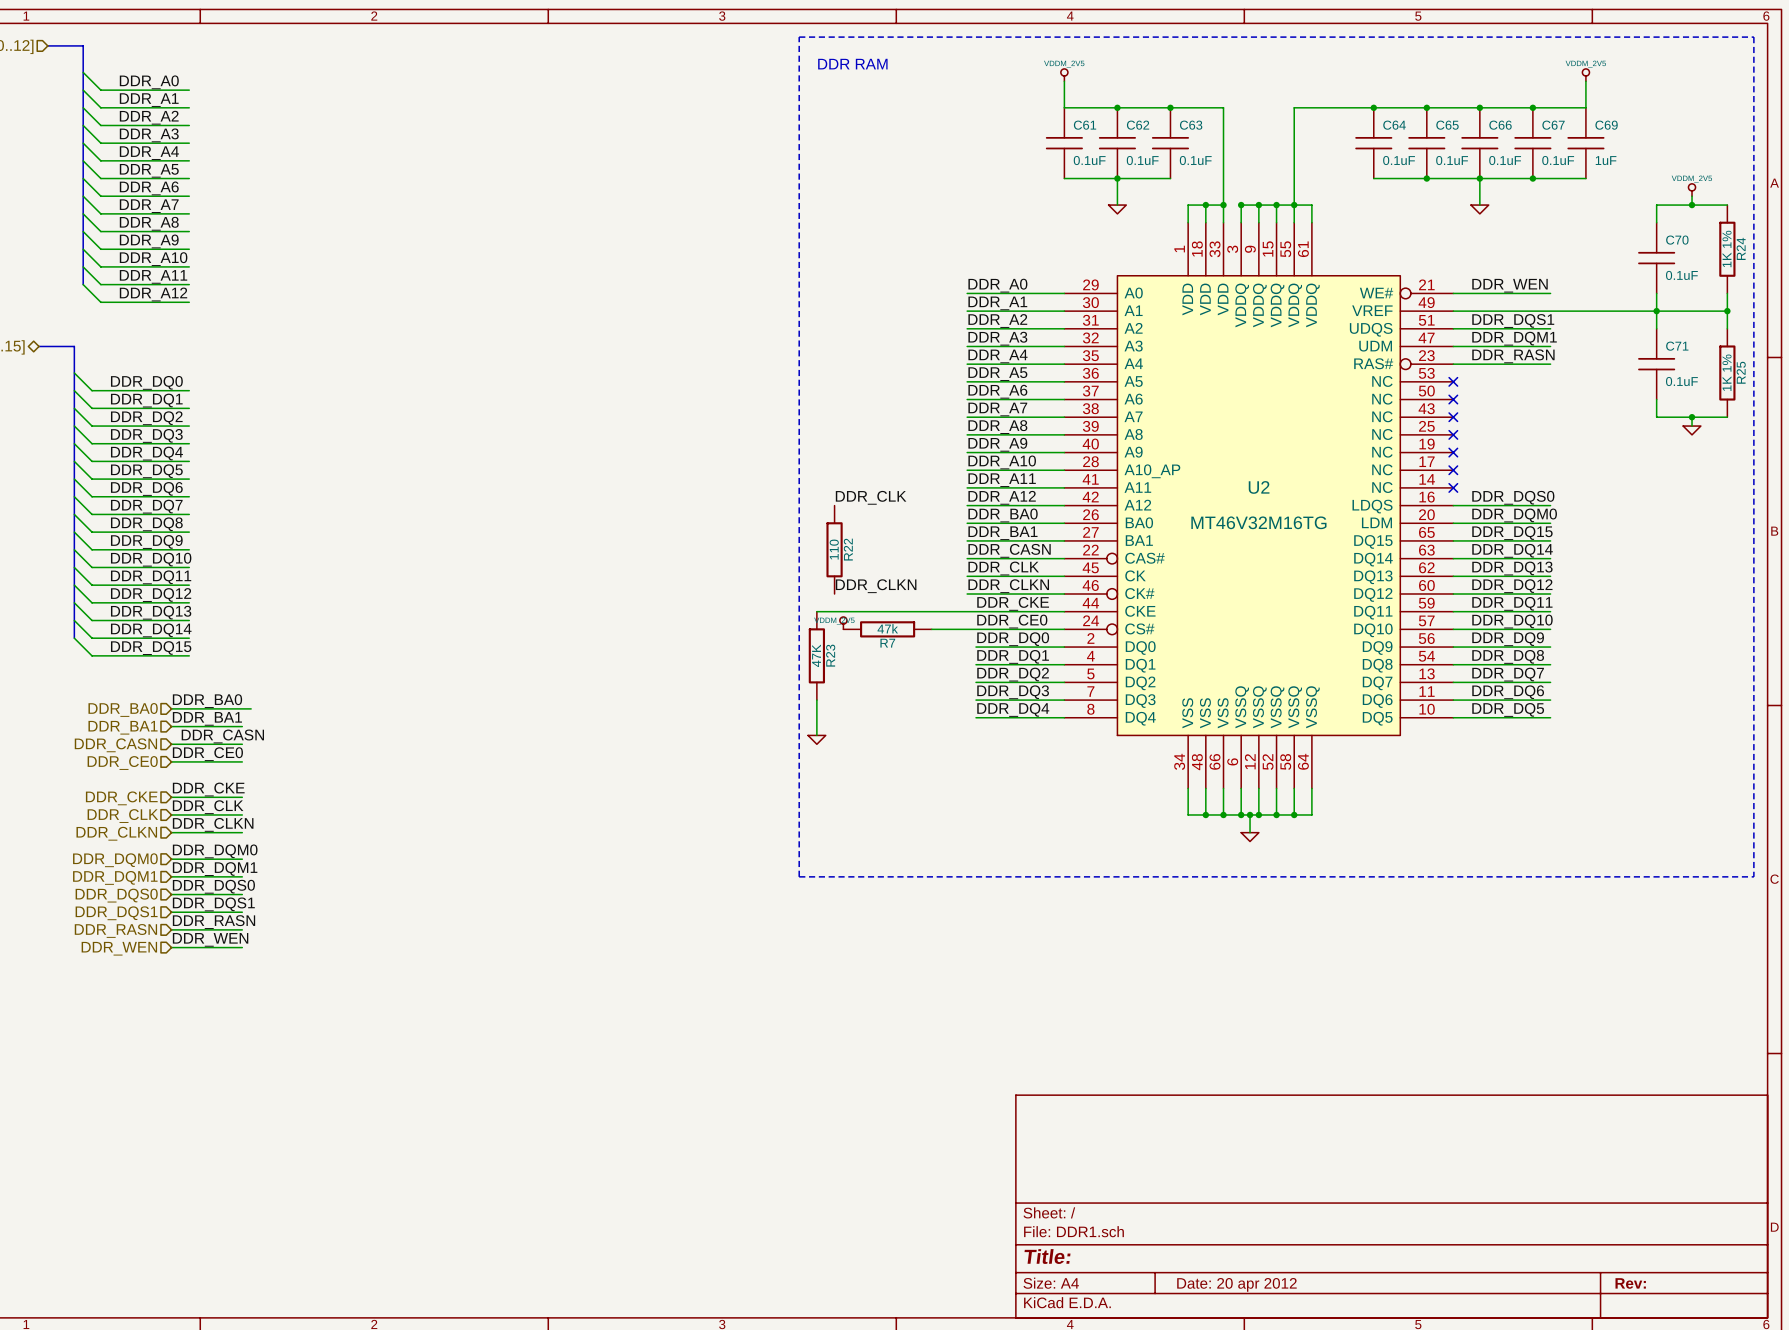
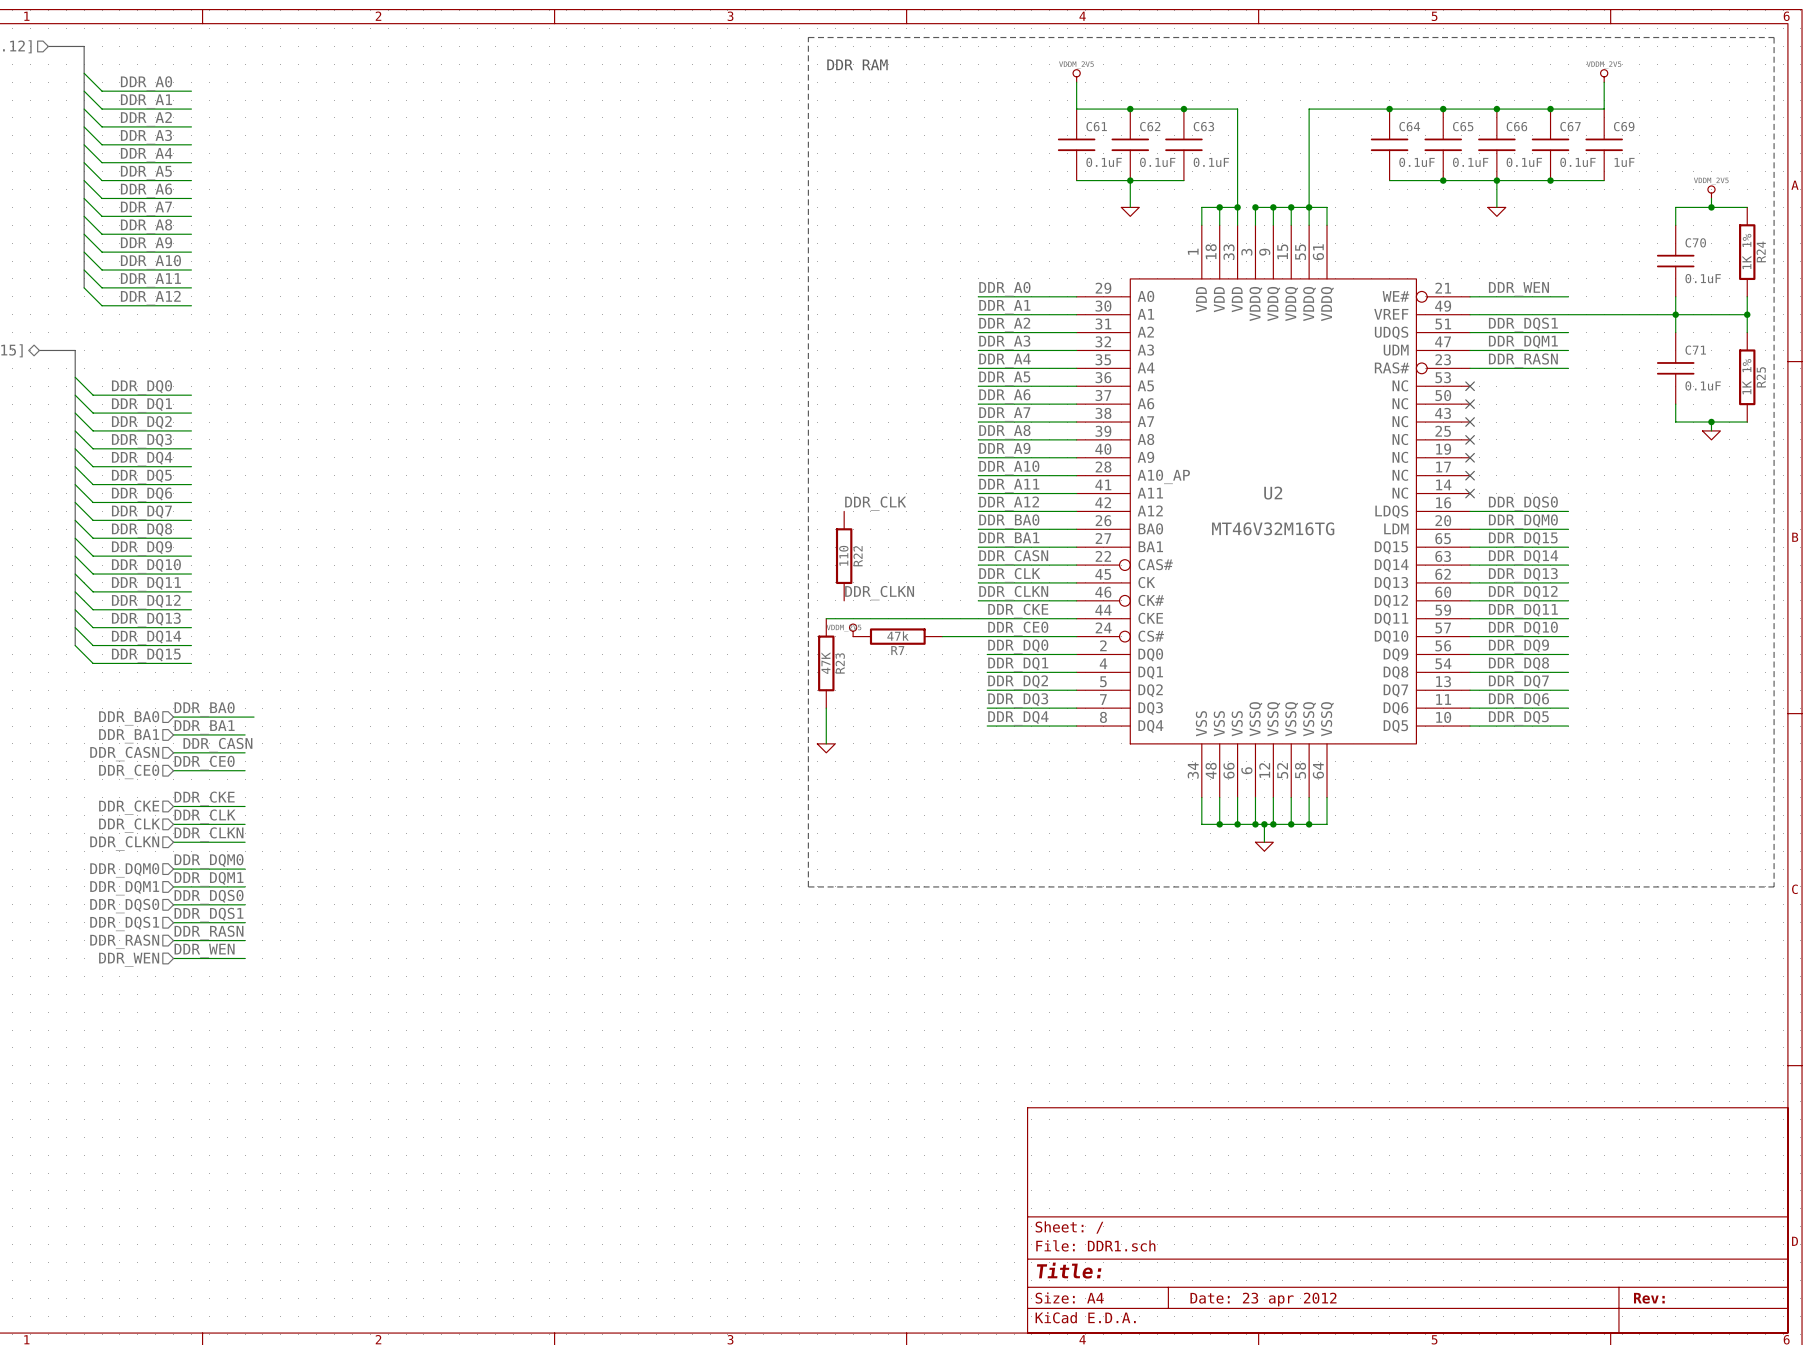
title block: Date: 20 apr 2012 (1236, 1284) -> Date: 23 apr 2012 (1263, 1299)

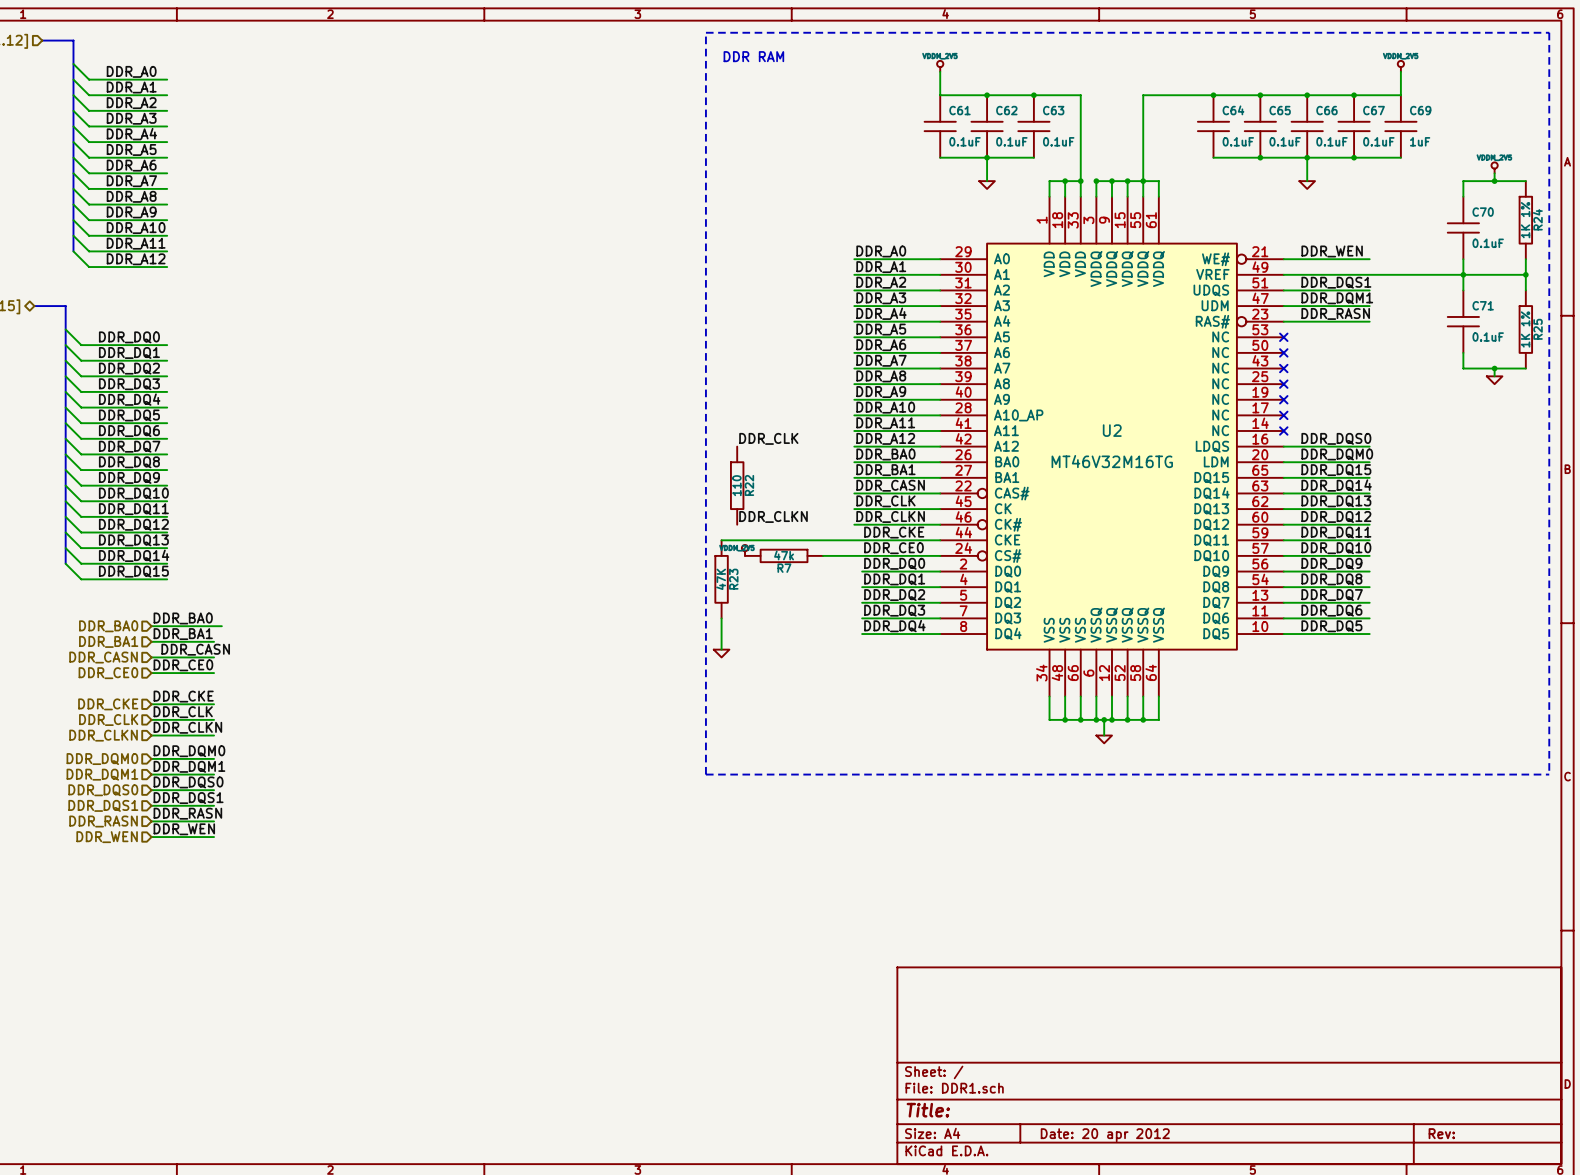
title block: Date: 23 apr 2012 (1263, 1299) -> Date: 20 apr 2012 (1105, 1135)

